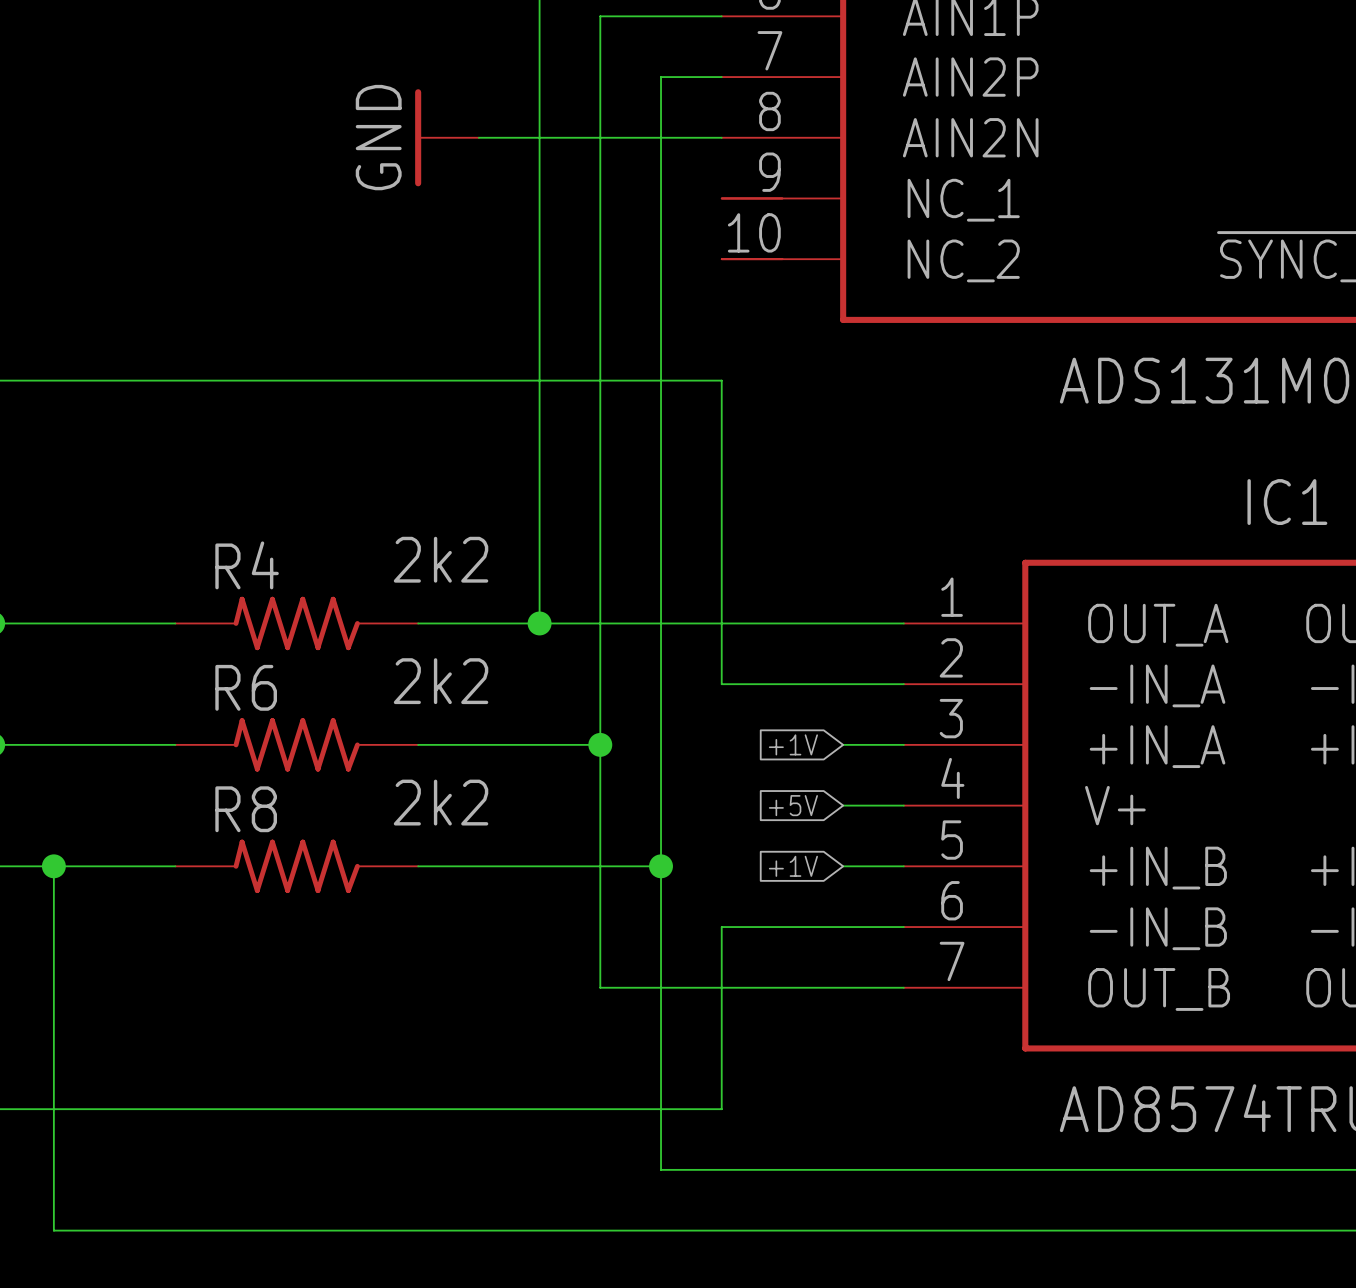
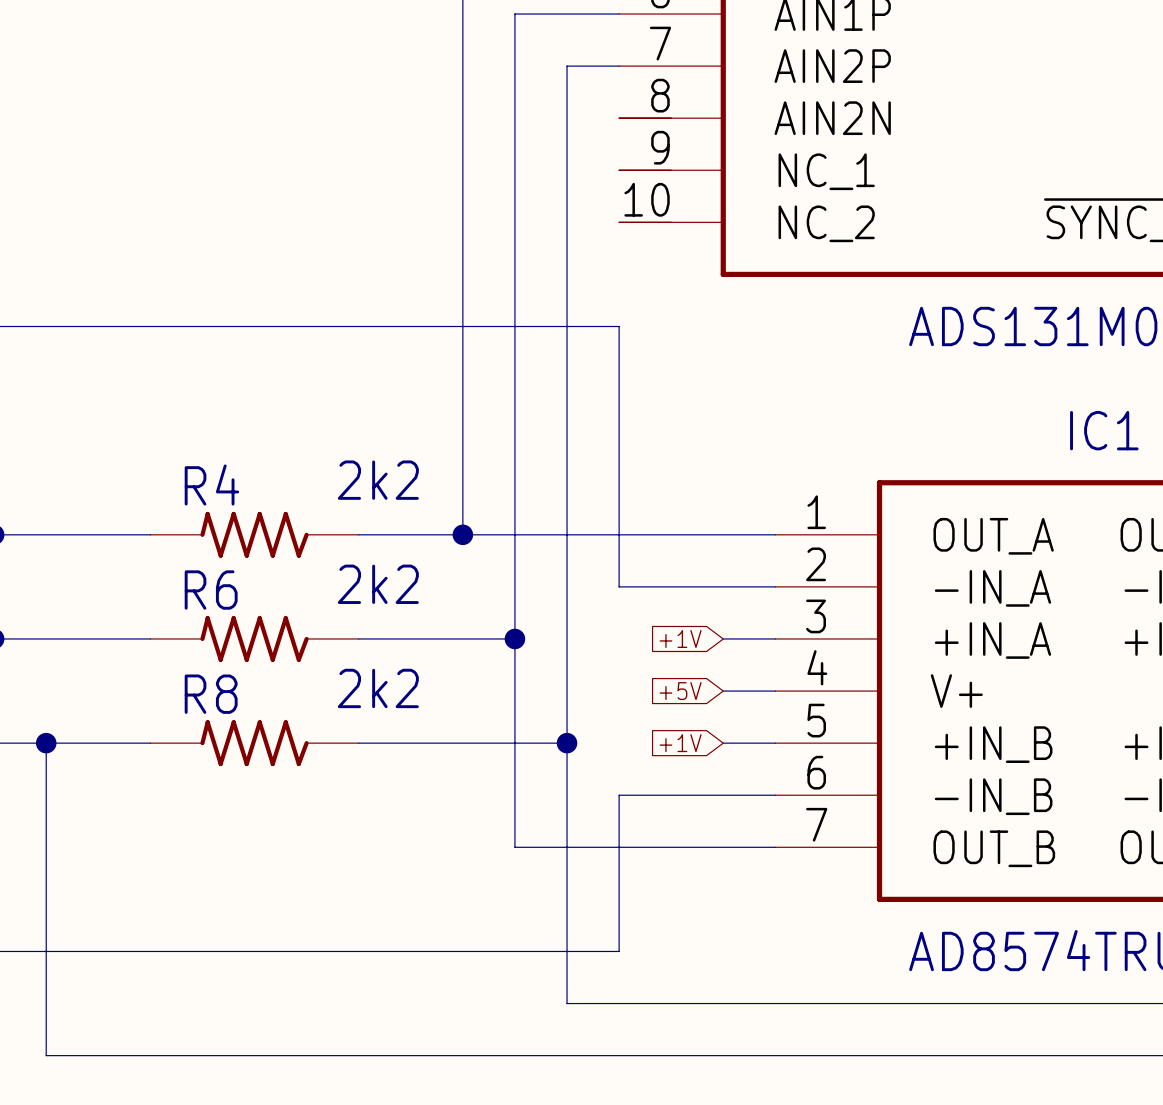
power symbol: GND (447, 137) -> none
wire: (478, 137) (721, 137) -> none
part: none -> (645, 118)

